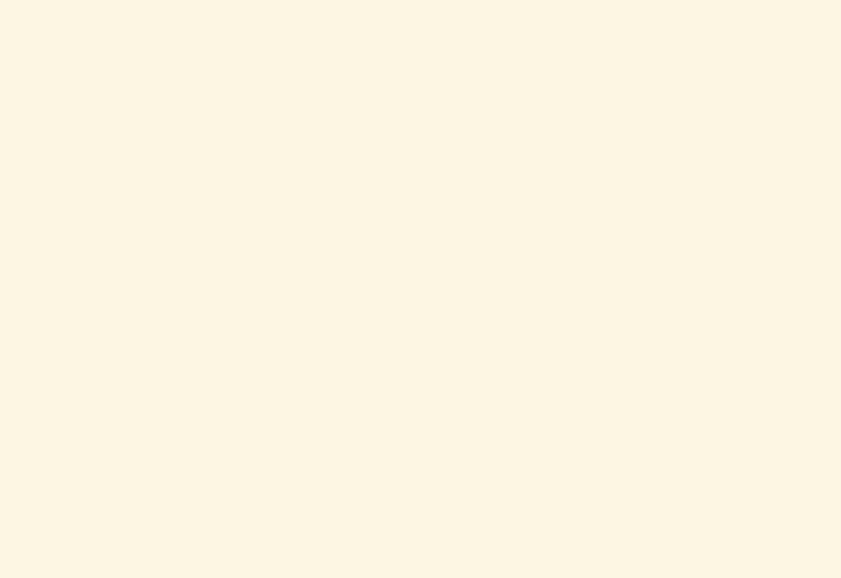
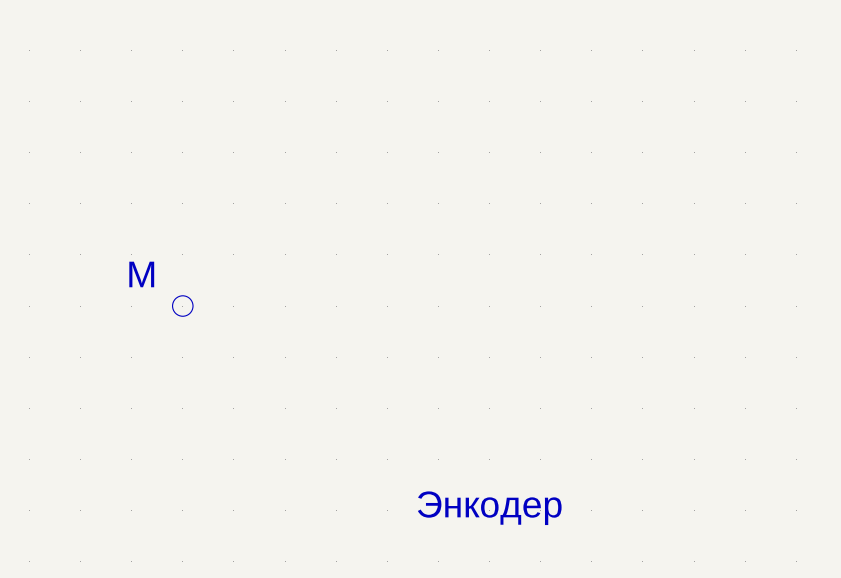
text: none -> M (141, 274)
drawing: none -> [172, 295, 194, 317]
text: none -> Энкодер (489, 508)

